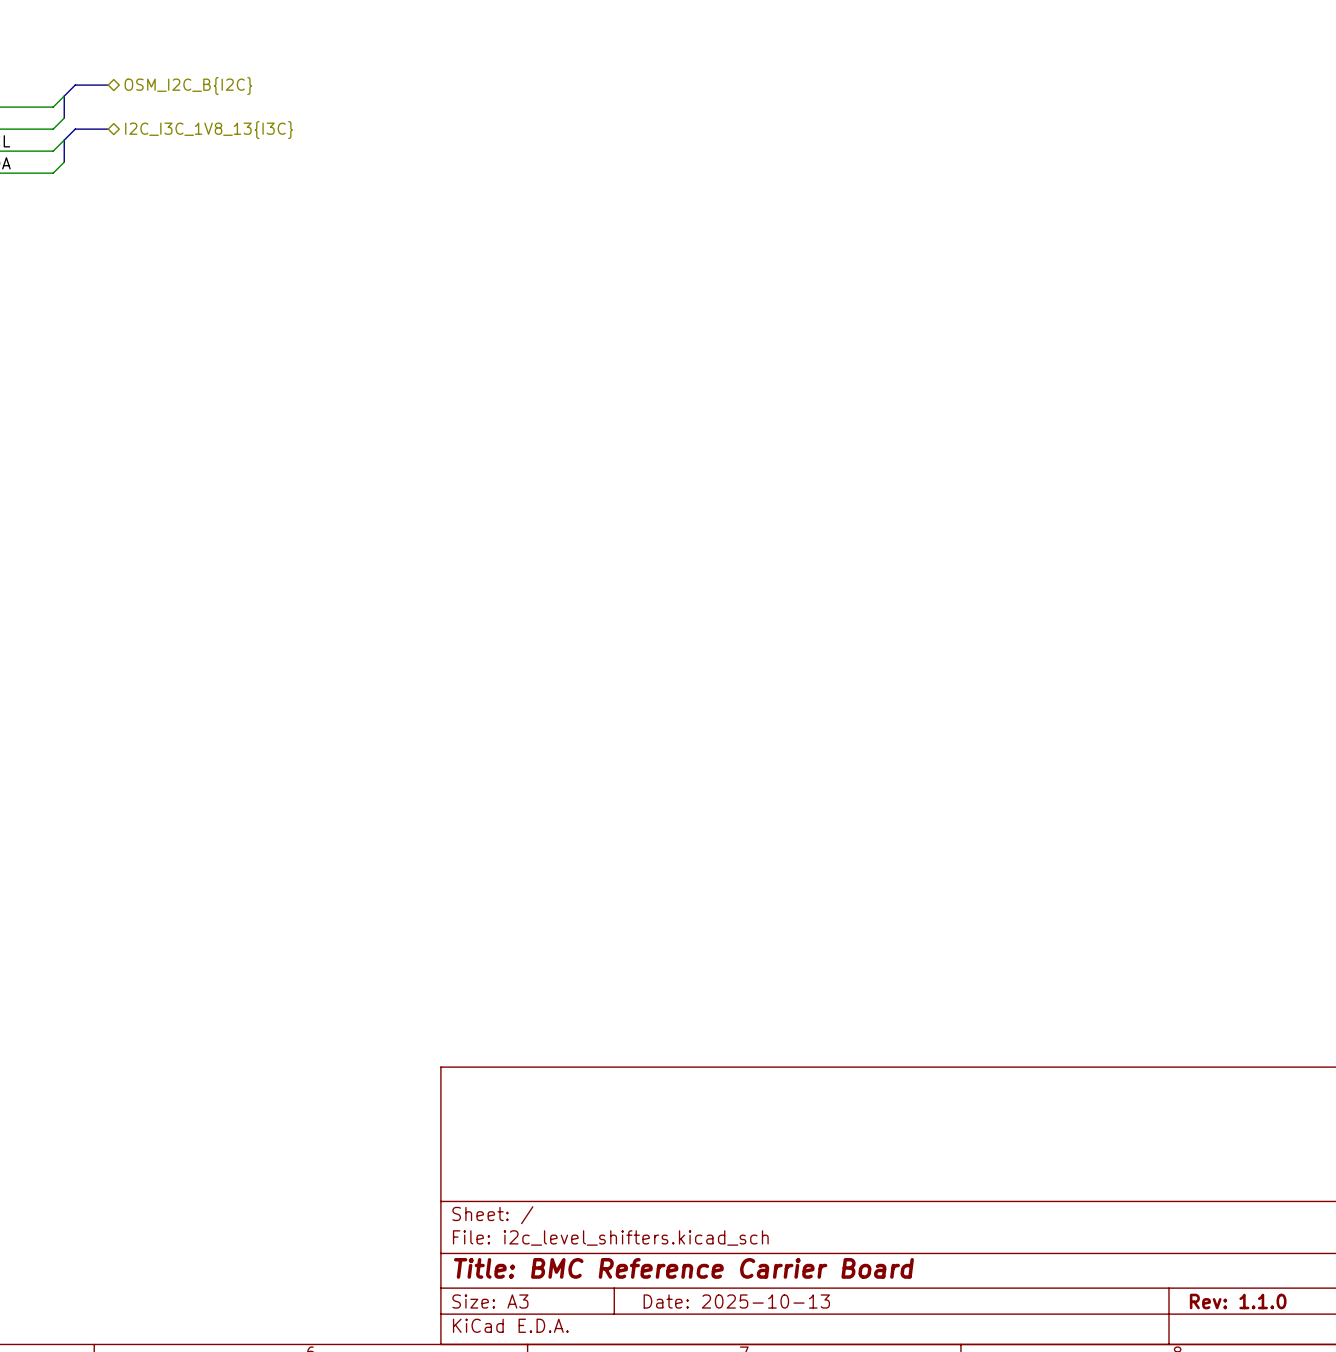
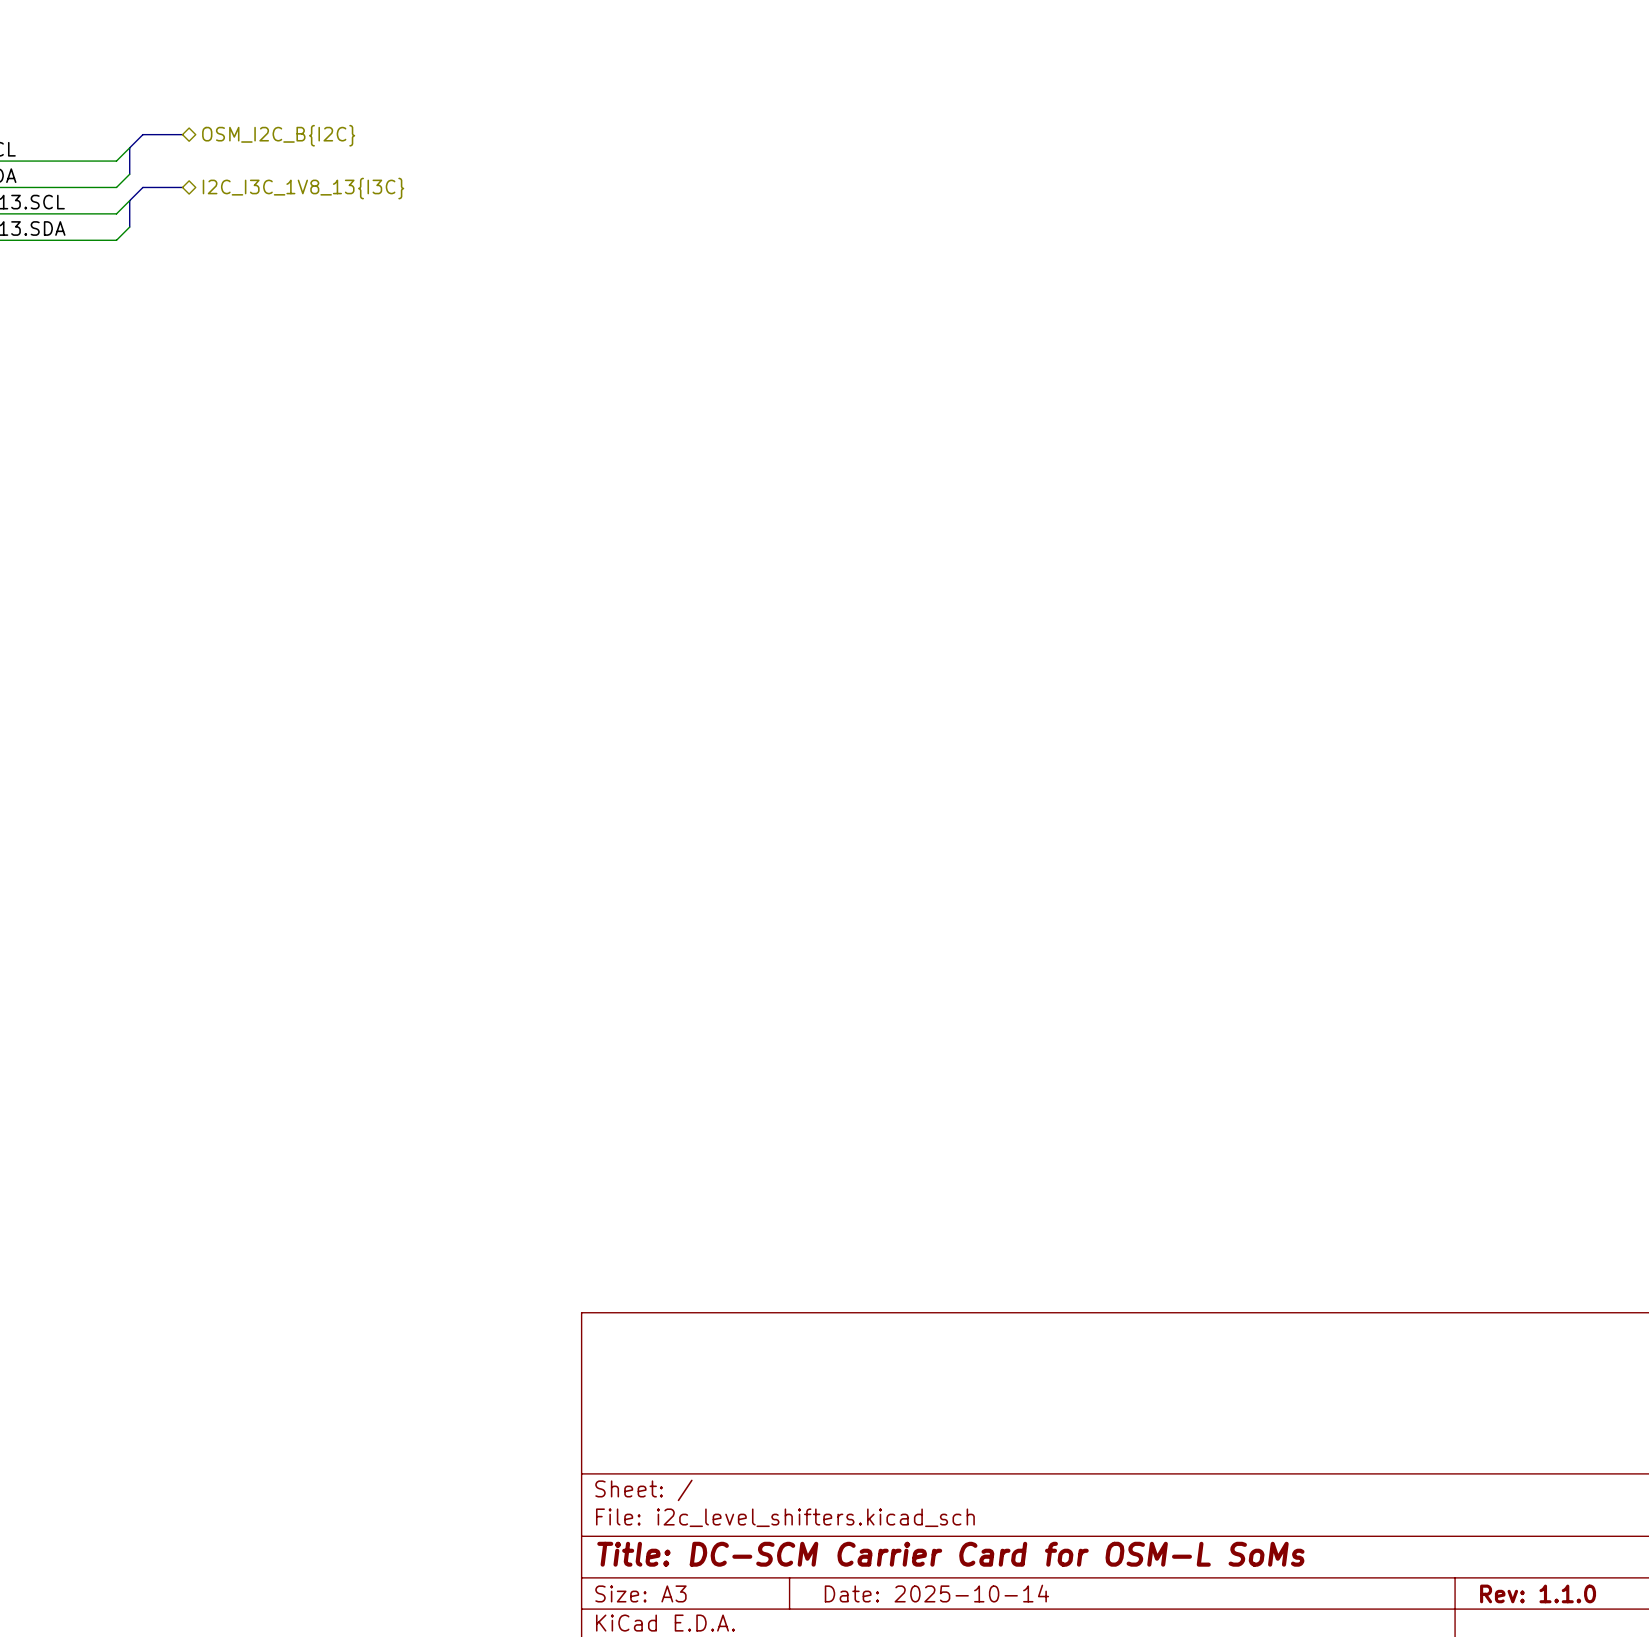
title block: Title: BMC Reference Carrier Board (683, 1268) -> Title: DC-SCM Carrier Card for OSM-L SoMs (950, 1554)
title block: Date: 2025-10-13 (736, 1301) -> Date: 2025-10-14 (936, 1593)

